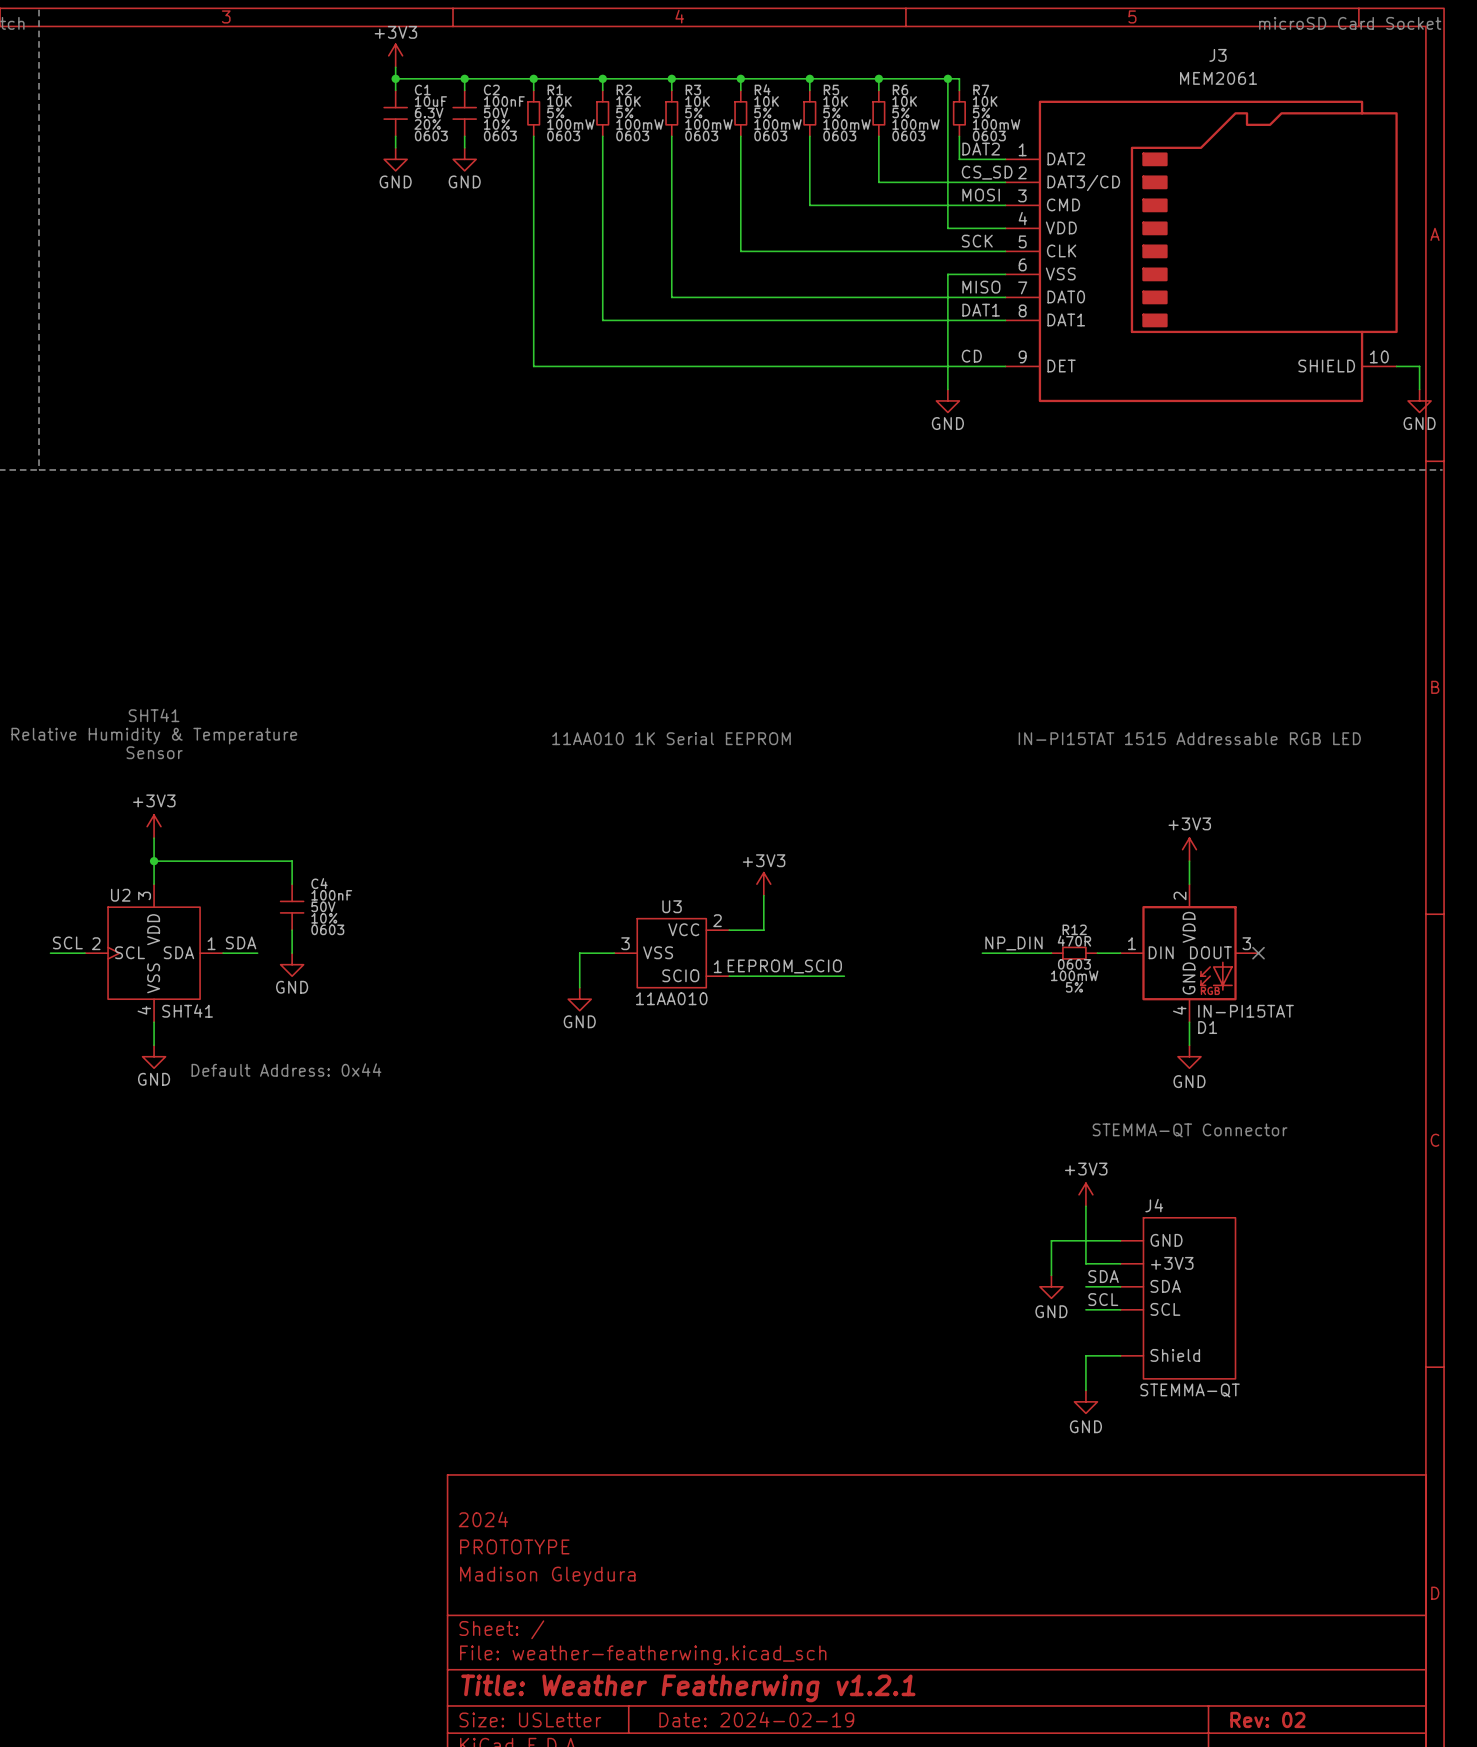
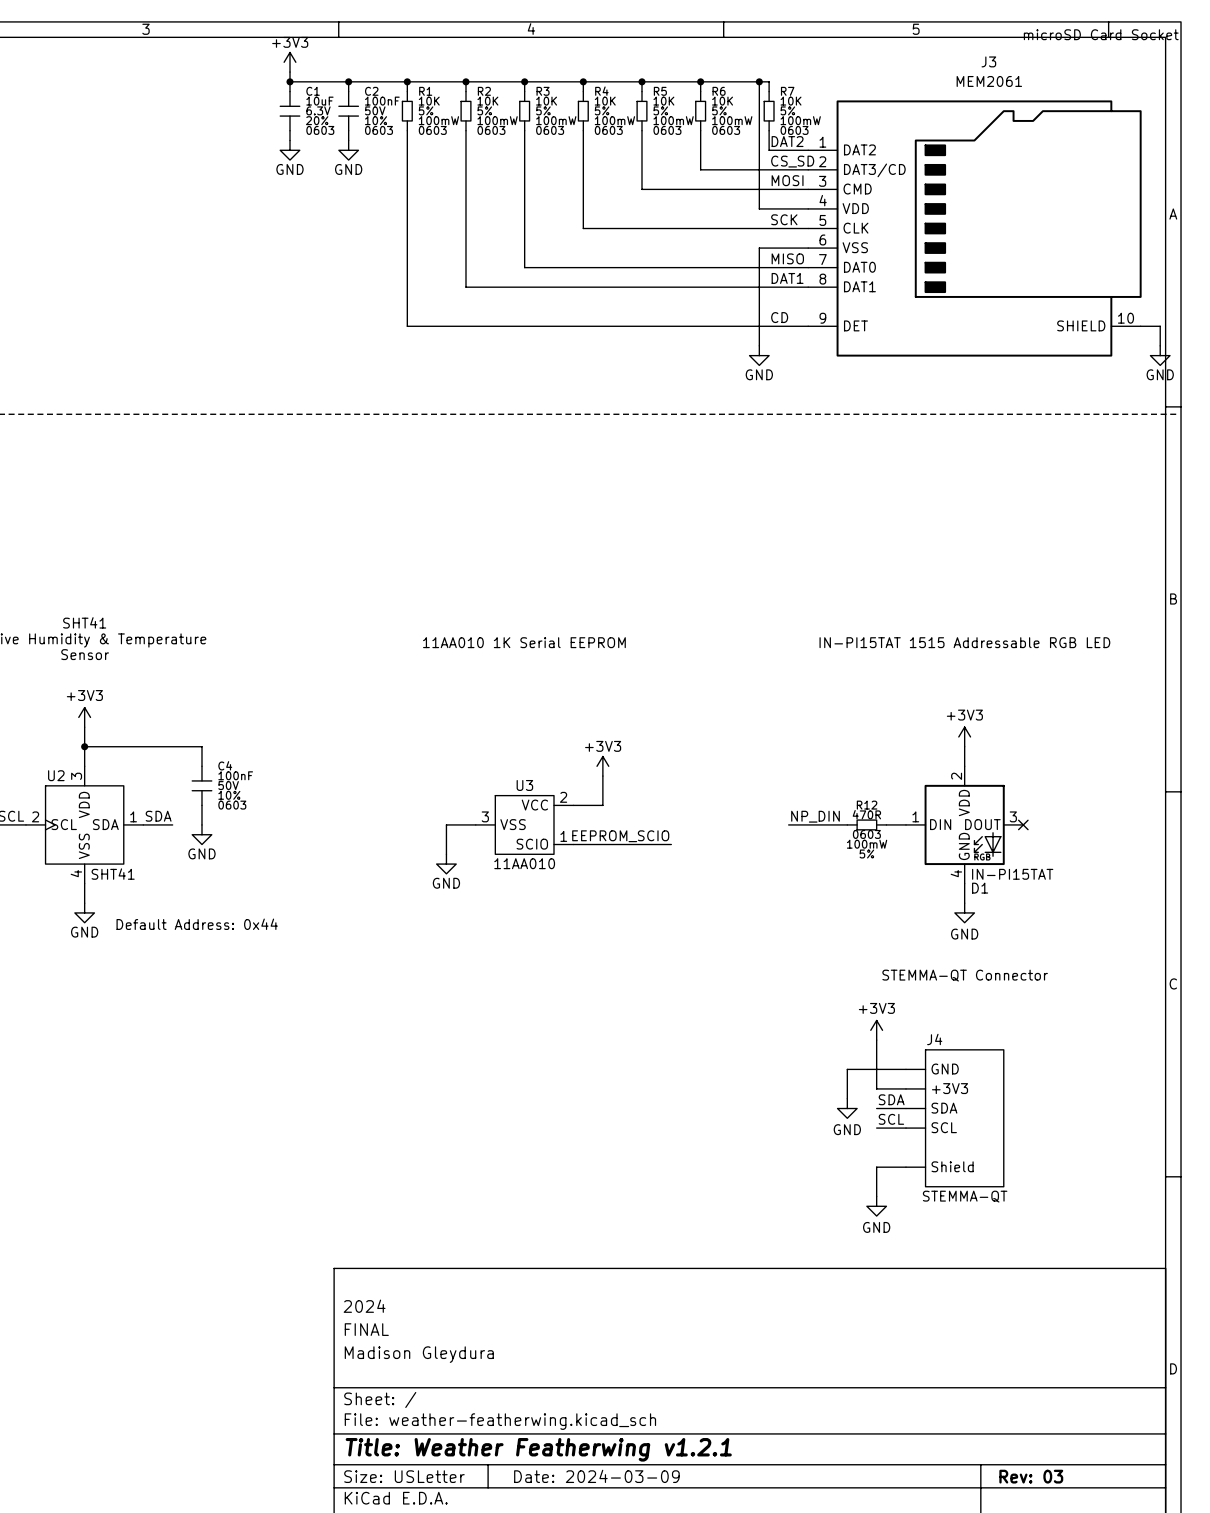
title block: PROTOTYPE (514, 1546) -> FINAL (366, 1329)
title block: Date: 2024-02-19 (756, 1719) -> Date: 2024-03-09 (596, 1476)
title block: Rev: 02 (1267, 1719) -> Rev: 03 (1031, 1476)

